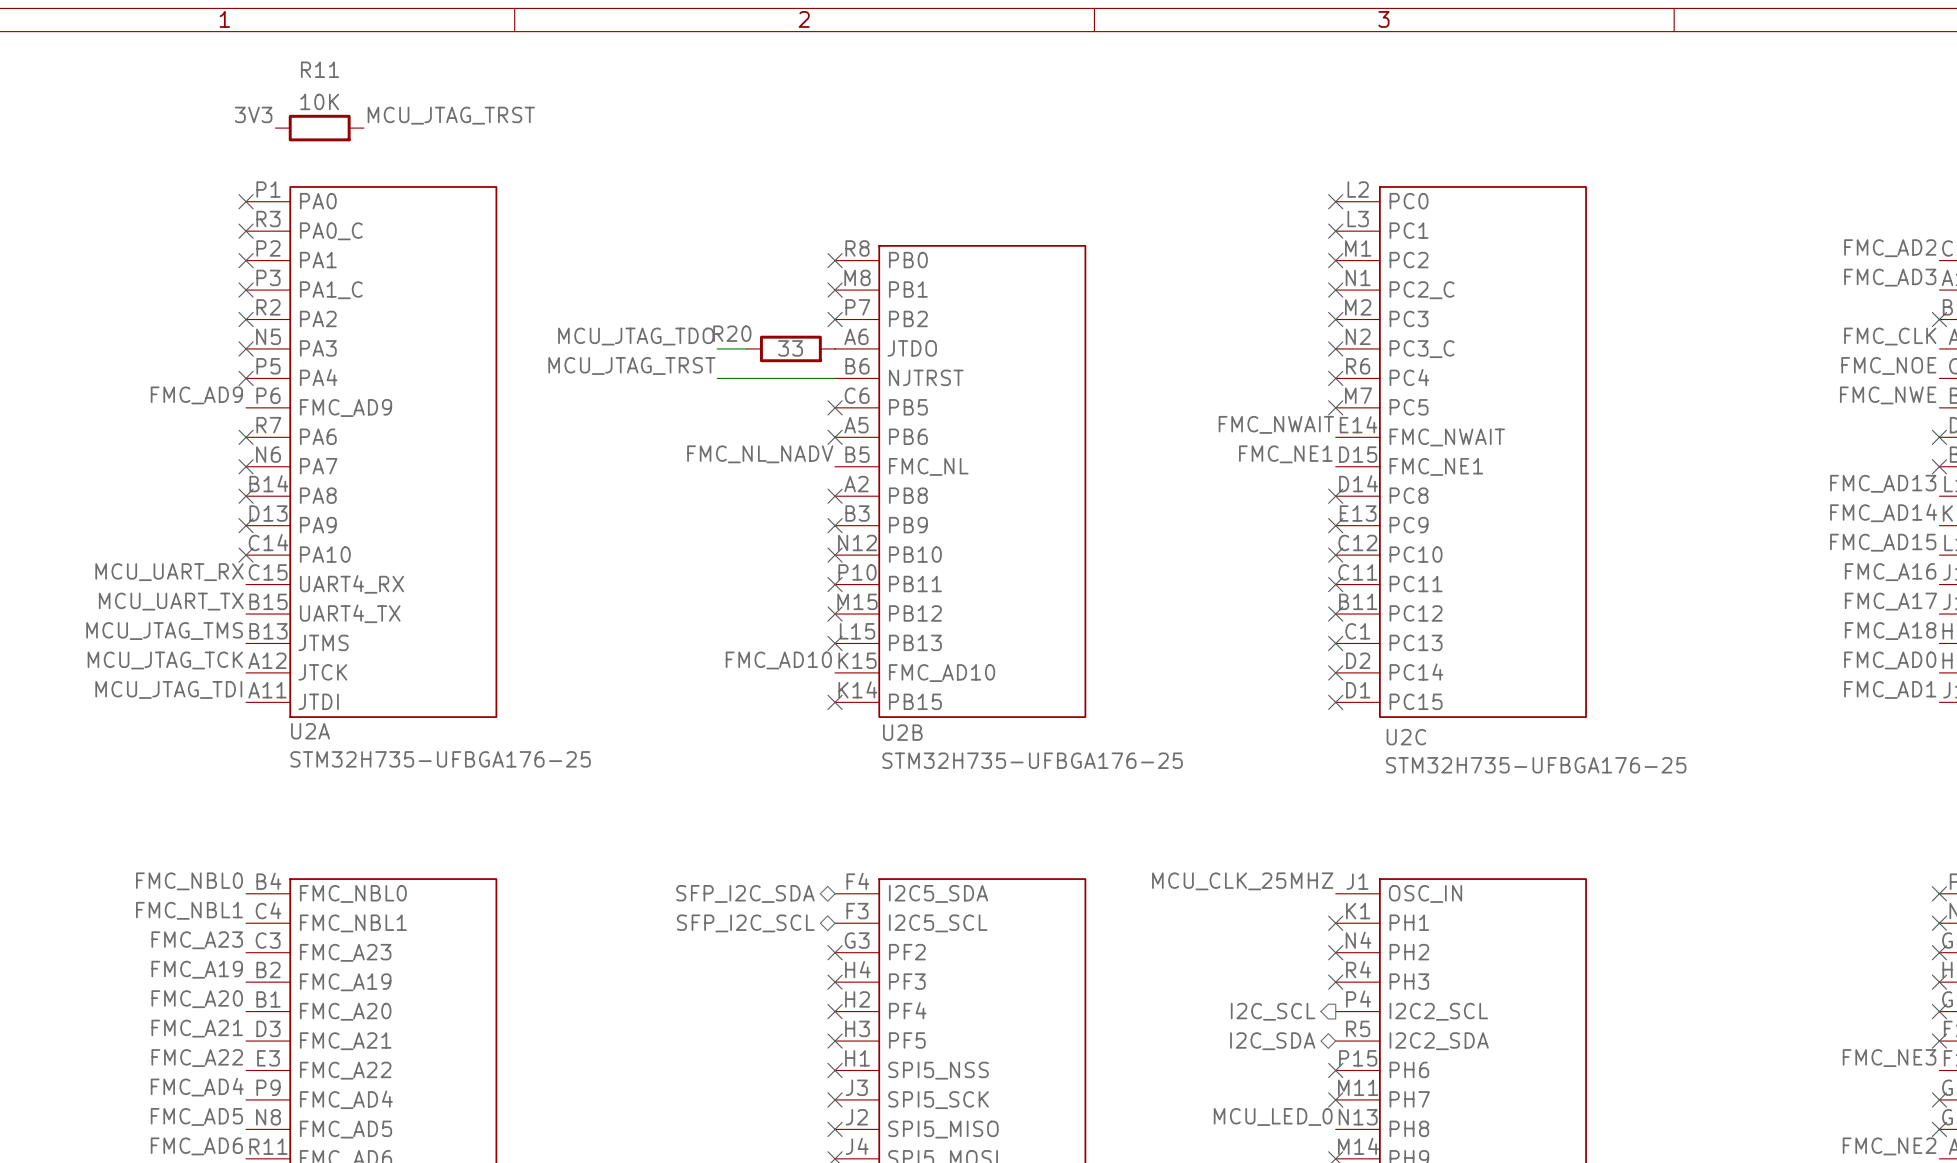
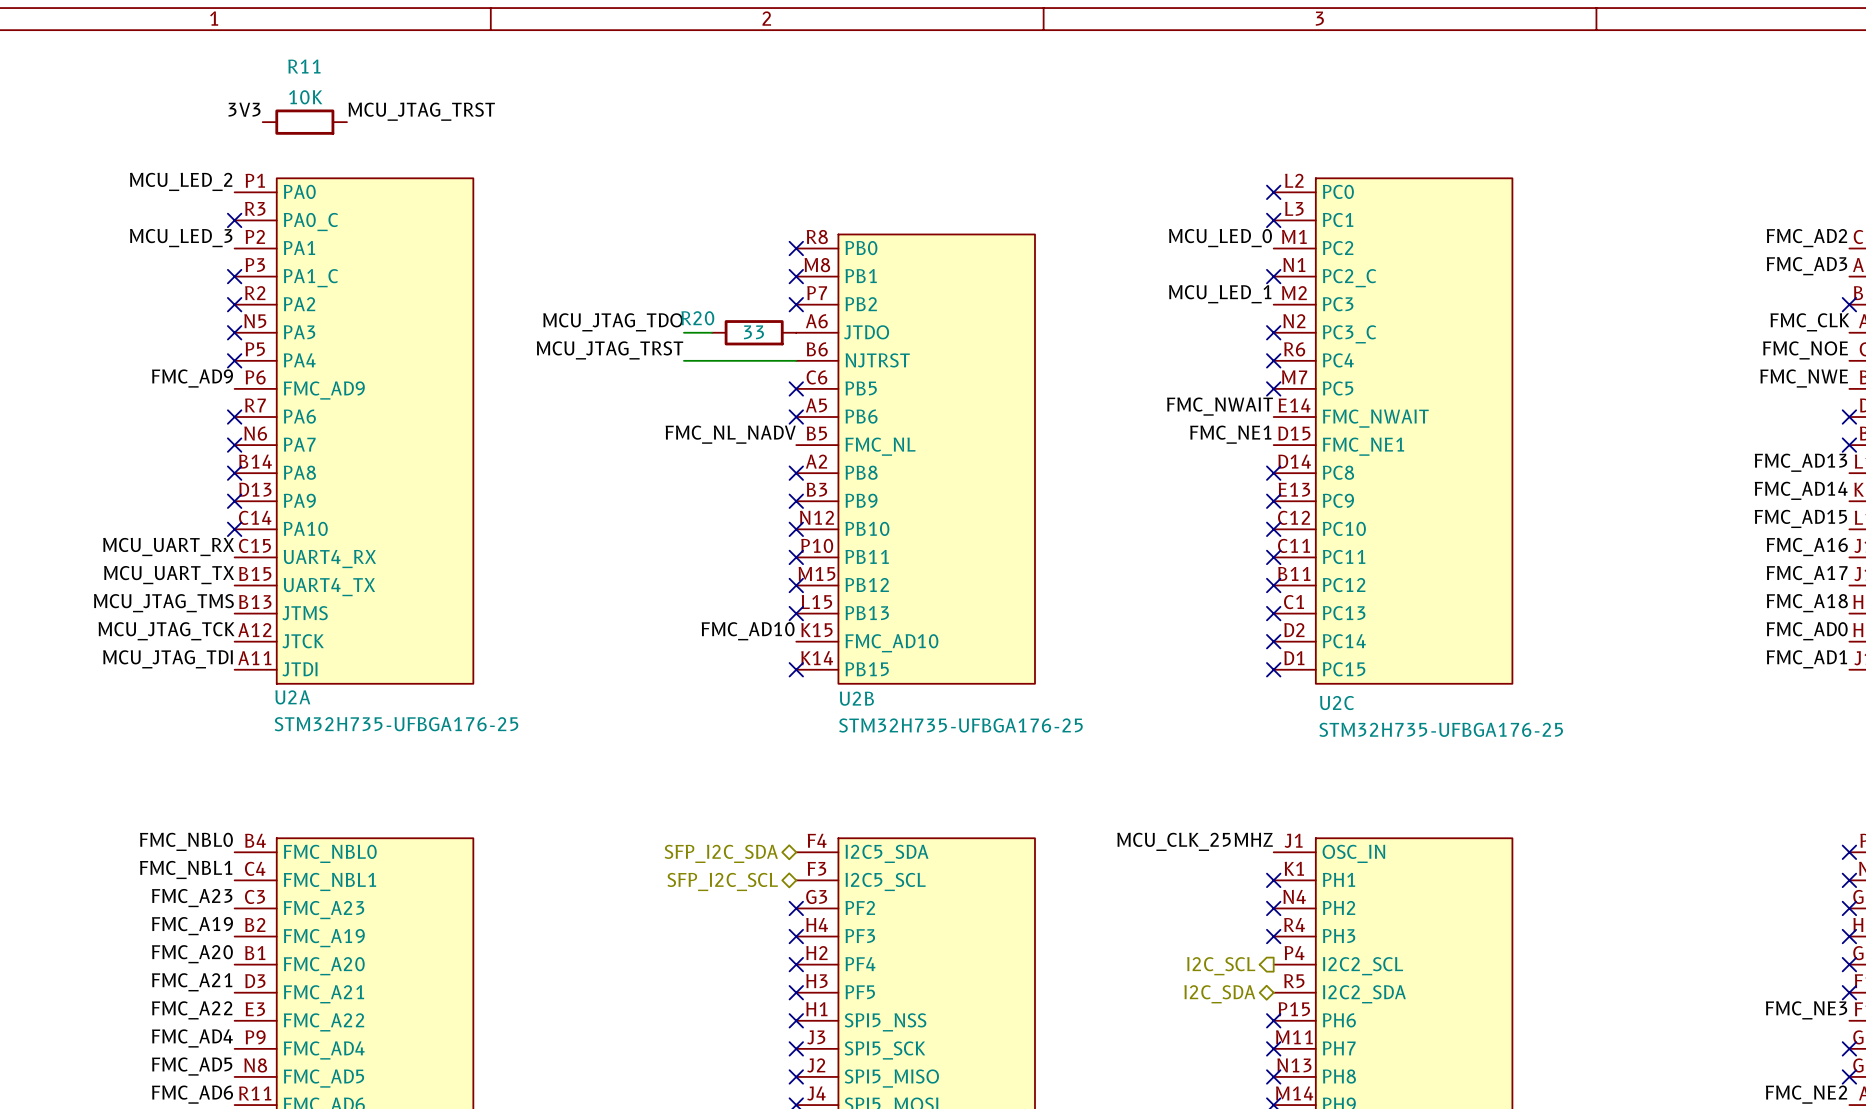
label: none -> MCU_LED_2 (181, 181)
no-connect mark: (246, 201) -> none
label: none -> MCU_LED_3 (181, 238)
label: none -> MCU_LED_0 (1220, 238)
no-connect mark: (246, 260) -> none
no-connect mark: (1335, 260) -> none
label: none -> MCU_LED_1 (1220, 294)
no-connect mark: (1335, 319) -> none
label: MCU_LED_0 (1273, 1116) -> none
no-connect mark: none -> (1273, 1076)

